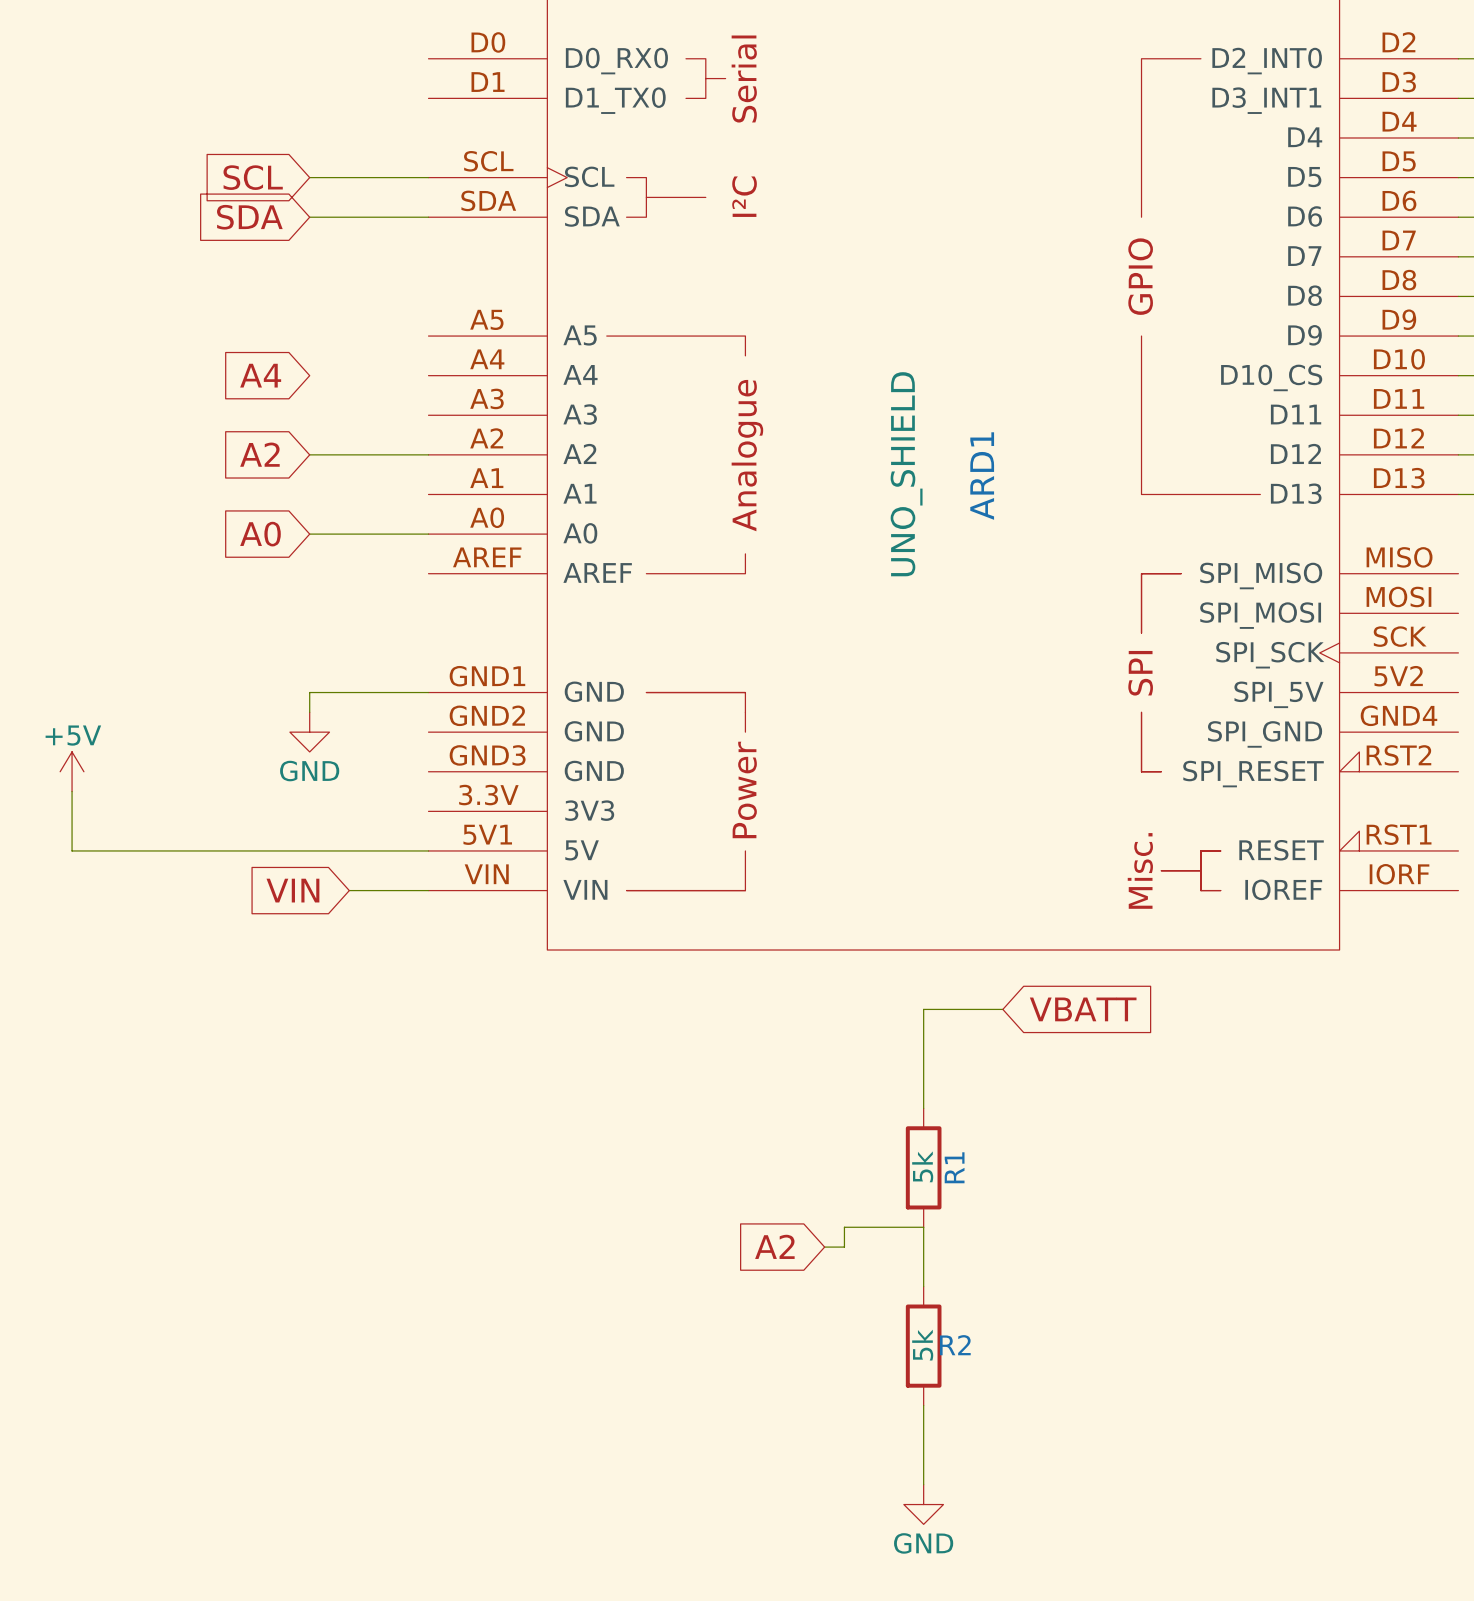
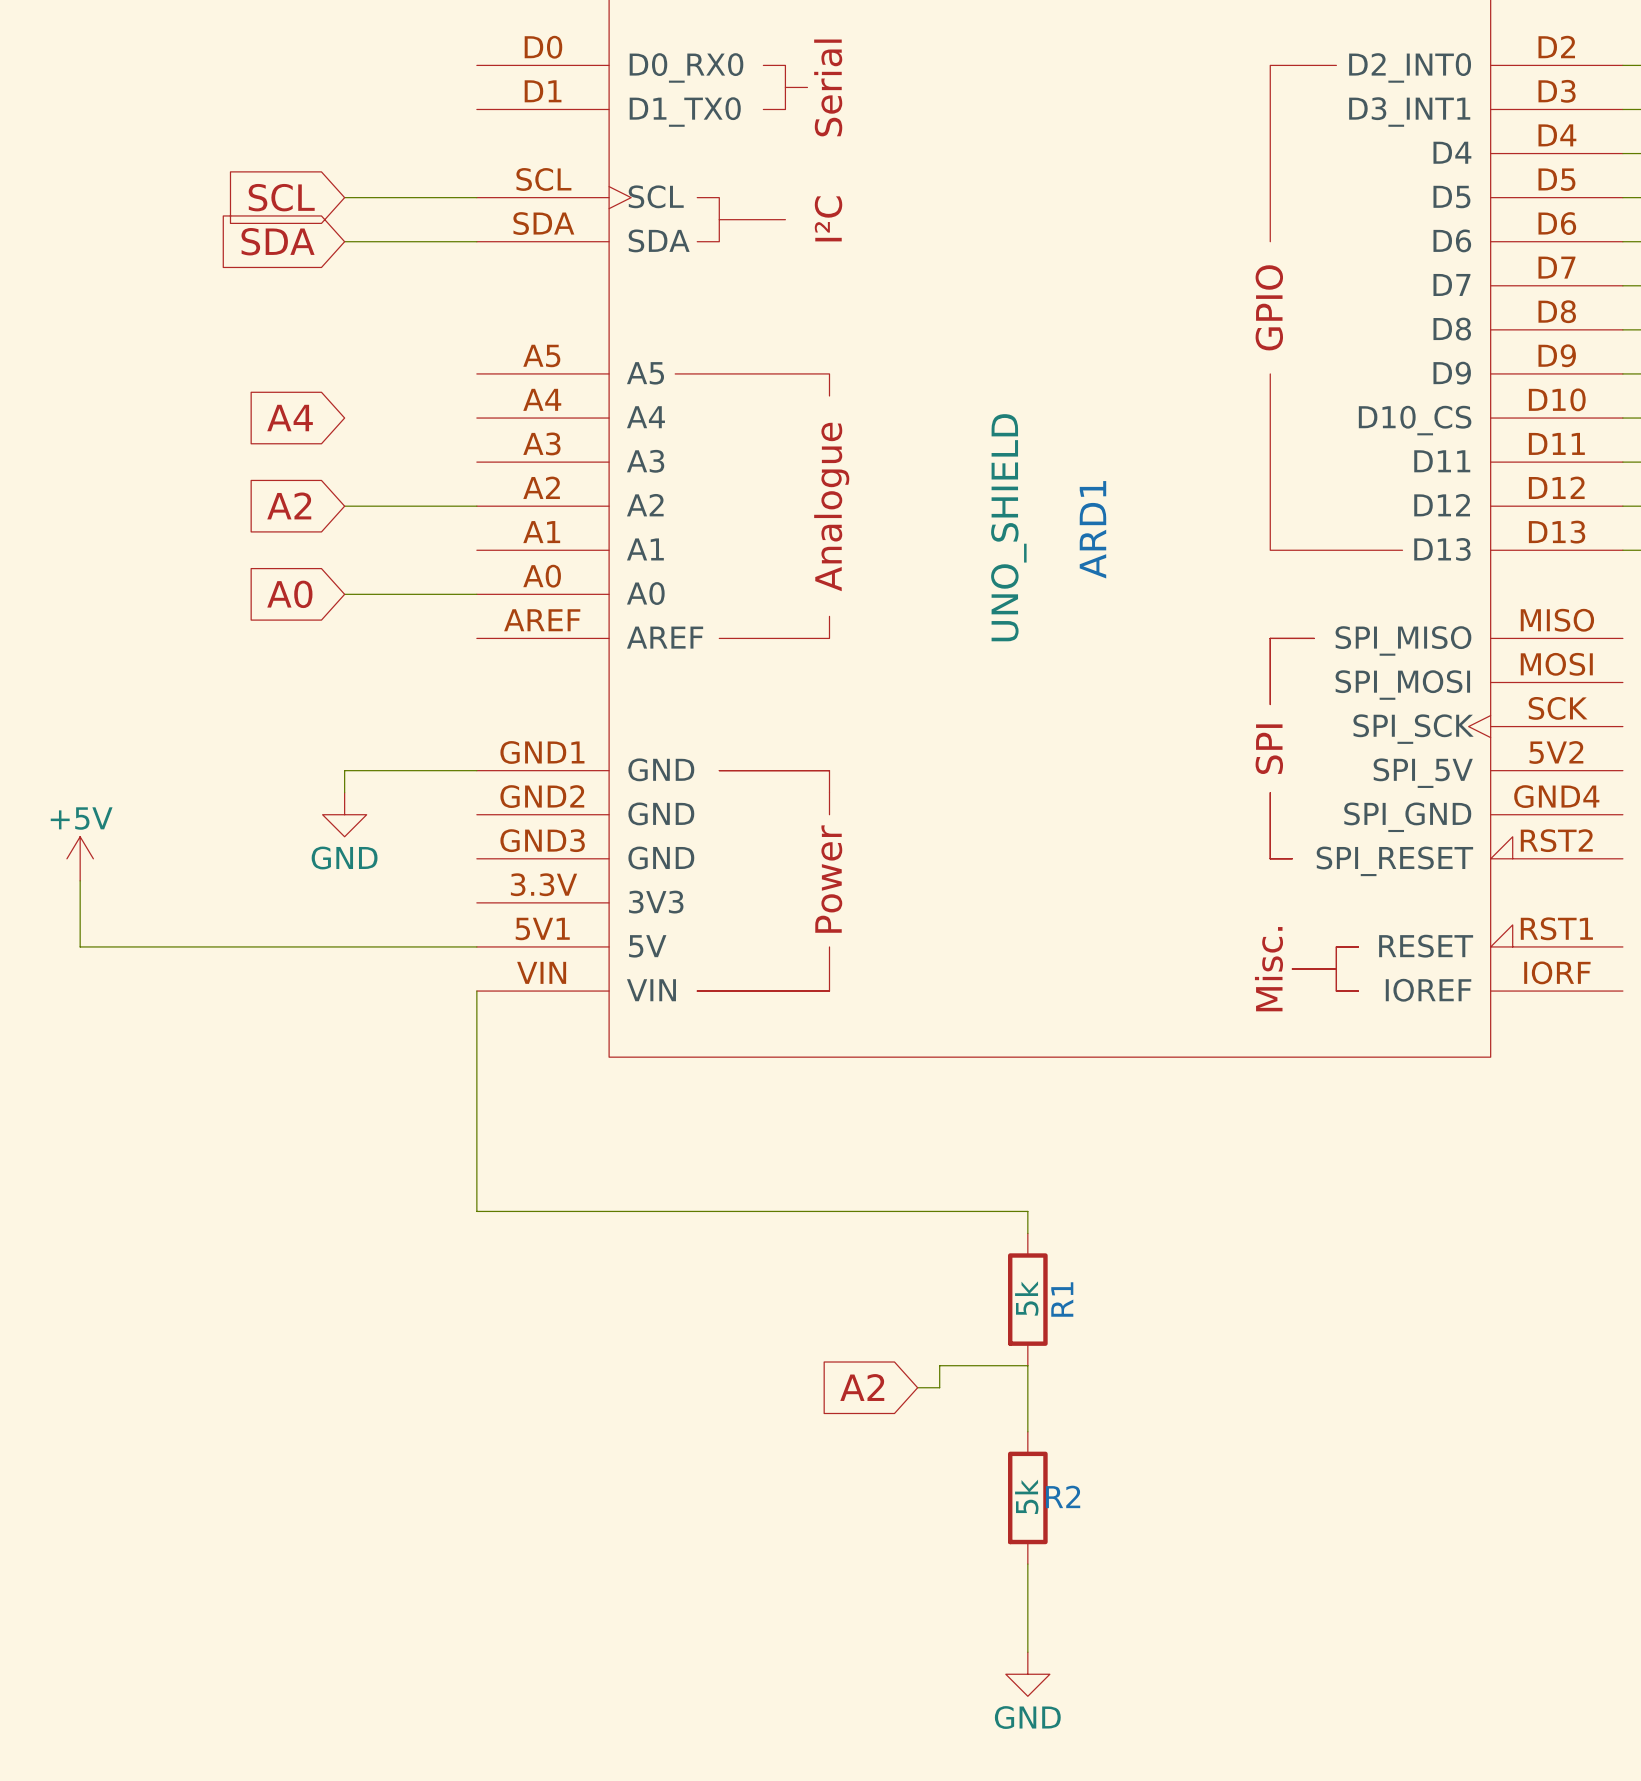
global label: VIN (292, 890) -> none
wire: (349, 890) (428, 890) -> none
wire: (1002, 1009) (923, 1009) (923, 1088) -> (476, 991) (476, 1211) (1027, 1211)
global label: VBATT (1083, 1009) -> none

